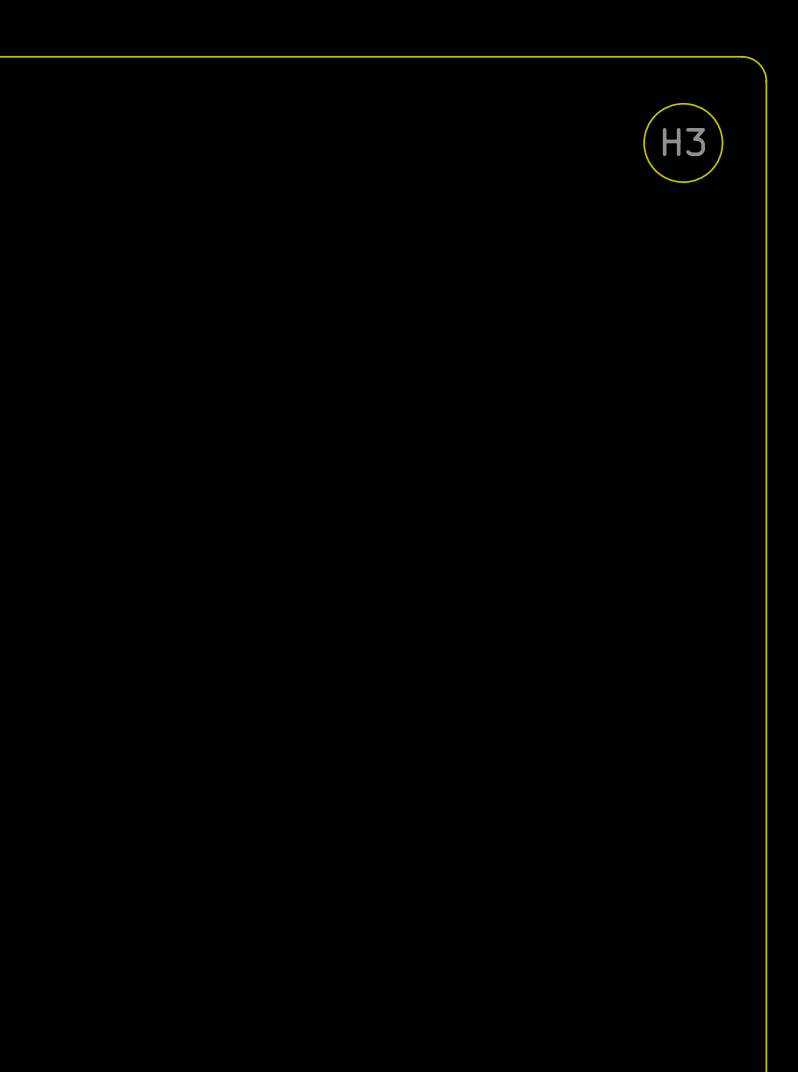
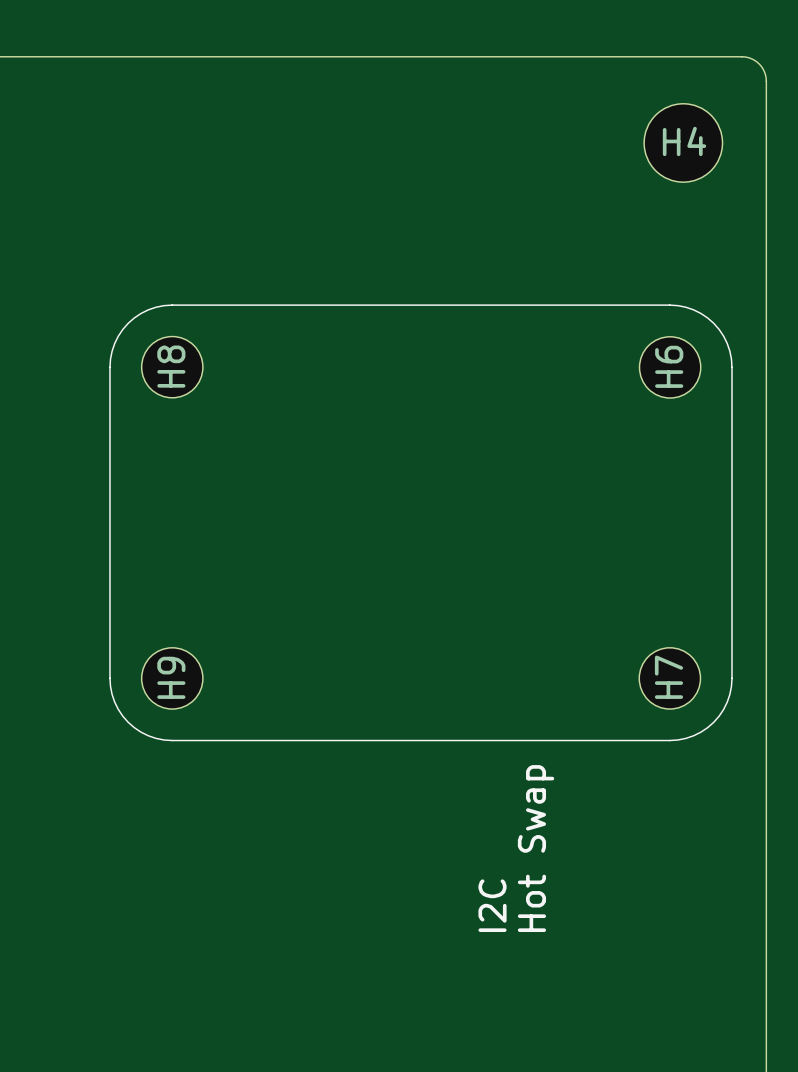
H3 name: H3 (683, 142) -> H4 (684, 141)
line: none -> (172, 305) (669, 305) (693, 309) (707, 317) (723, 336) (729, 351) (731, 367) (731, 678) (729, 694) (719, 716) (707, 727) (693, 735) (669, 740) (172, 740) (156, 738) (134, 727) (118, 709) (112, 694) (109, 678) (110, 359) (118, 336) (128, 323) (148, 309) (172, 305)
H8: none -> (172, 367)
H6: none -> (670, 367)
H9: none -> (172, 678)
H7: none -> (669, 678)
text: none -> Hot Swap (536, 848)
text: none -> I2C (492, 905)

